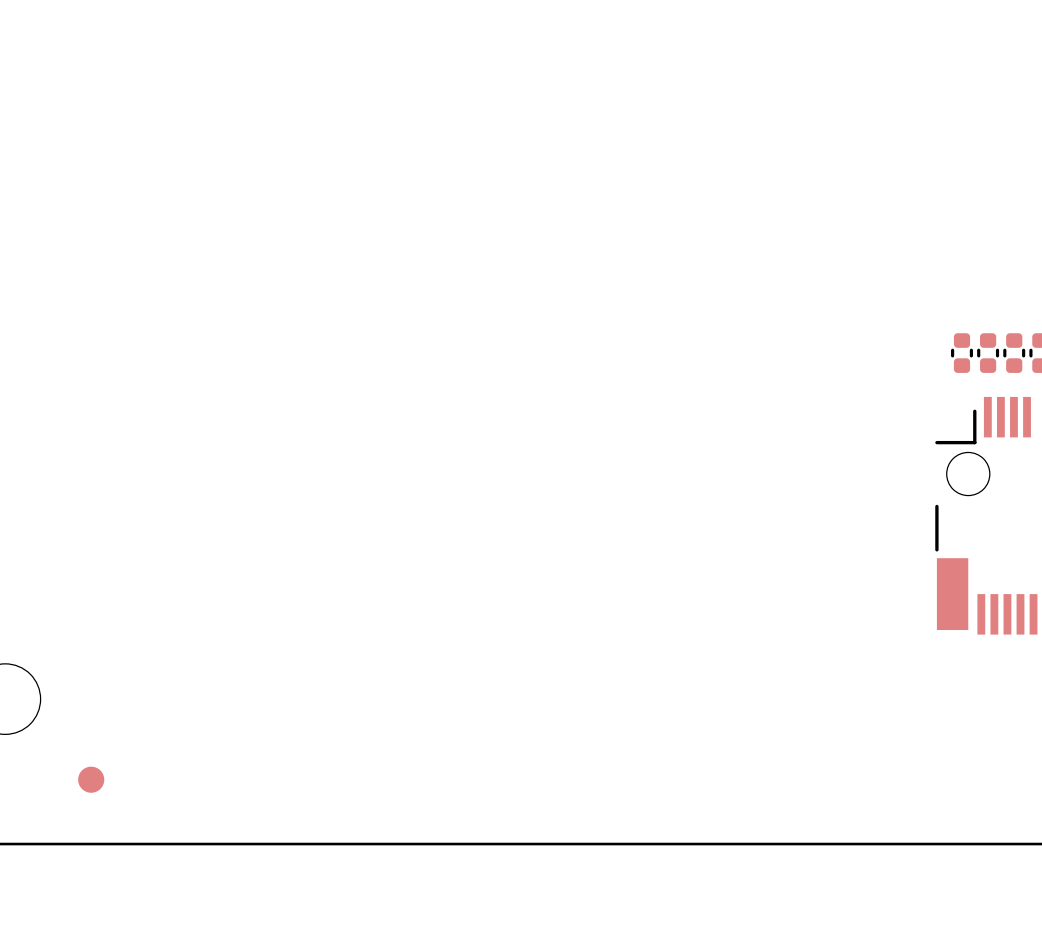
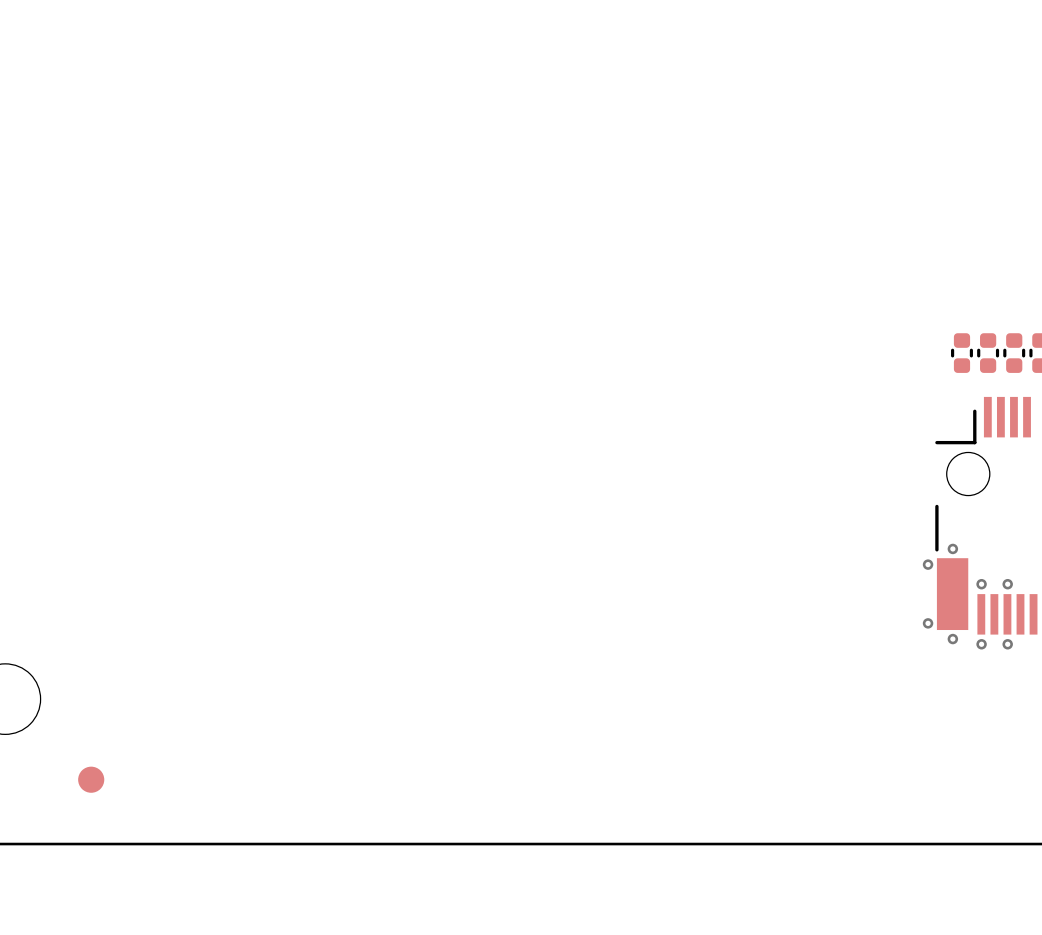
via: none -> (952, 548)
via: none -> (928, 564)
via: none -> (981, 584)
via: none -> (1007, 584)
via: none -> (928, 623)
via: none -> (952, 639)
via: none -> (981, 644)
via: none -> (1007, 644)

